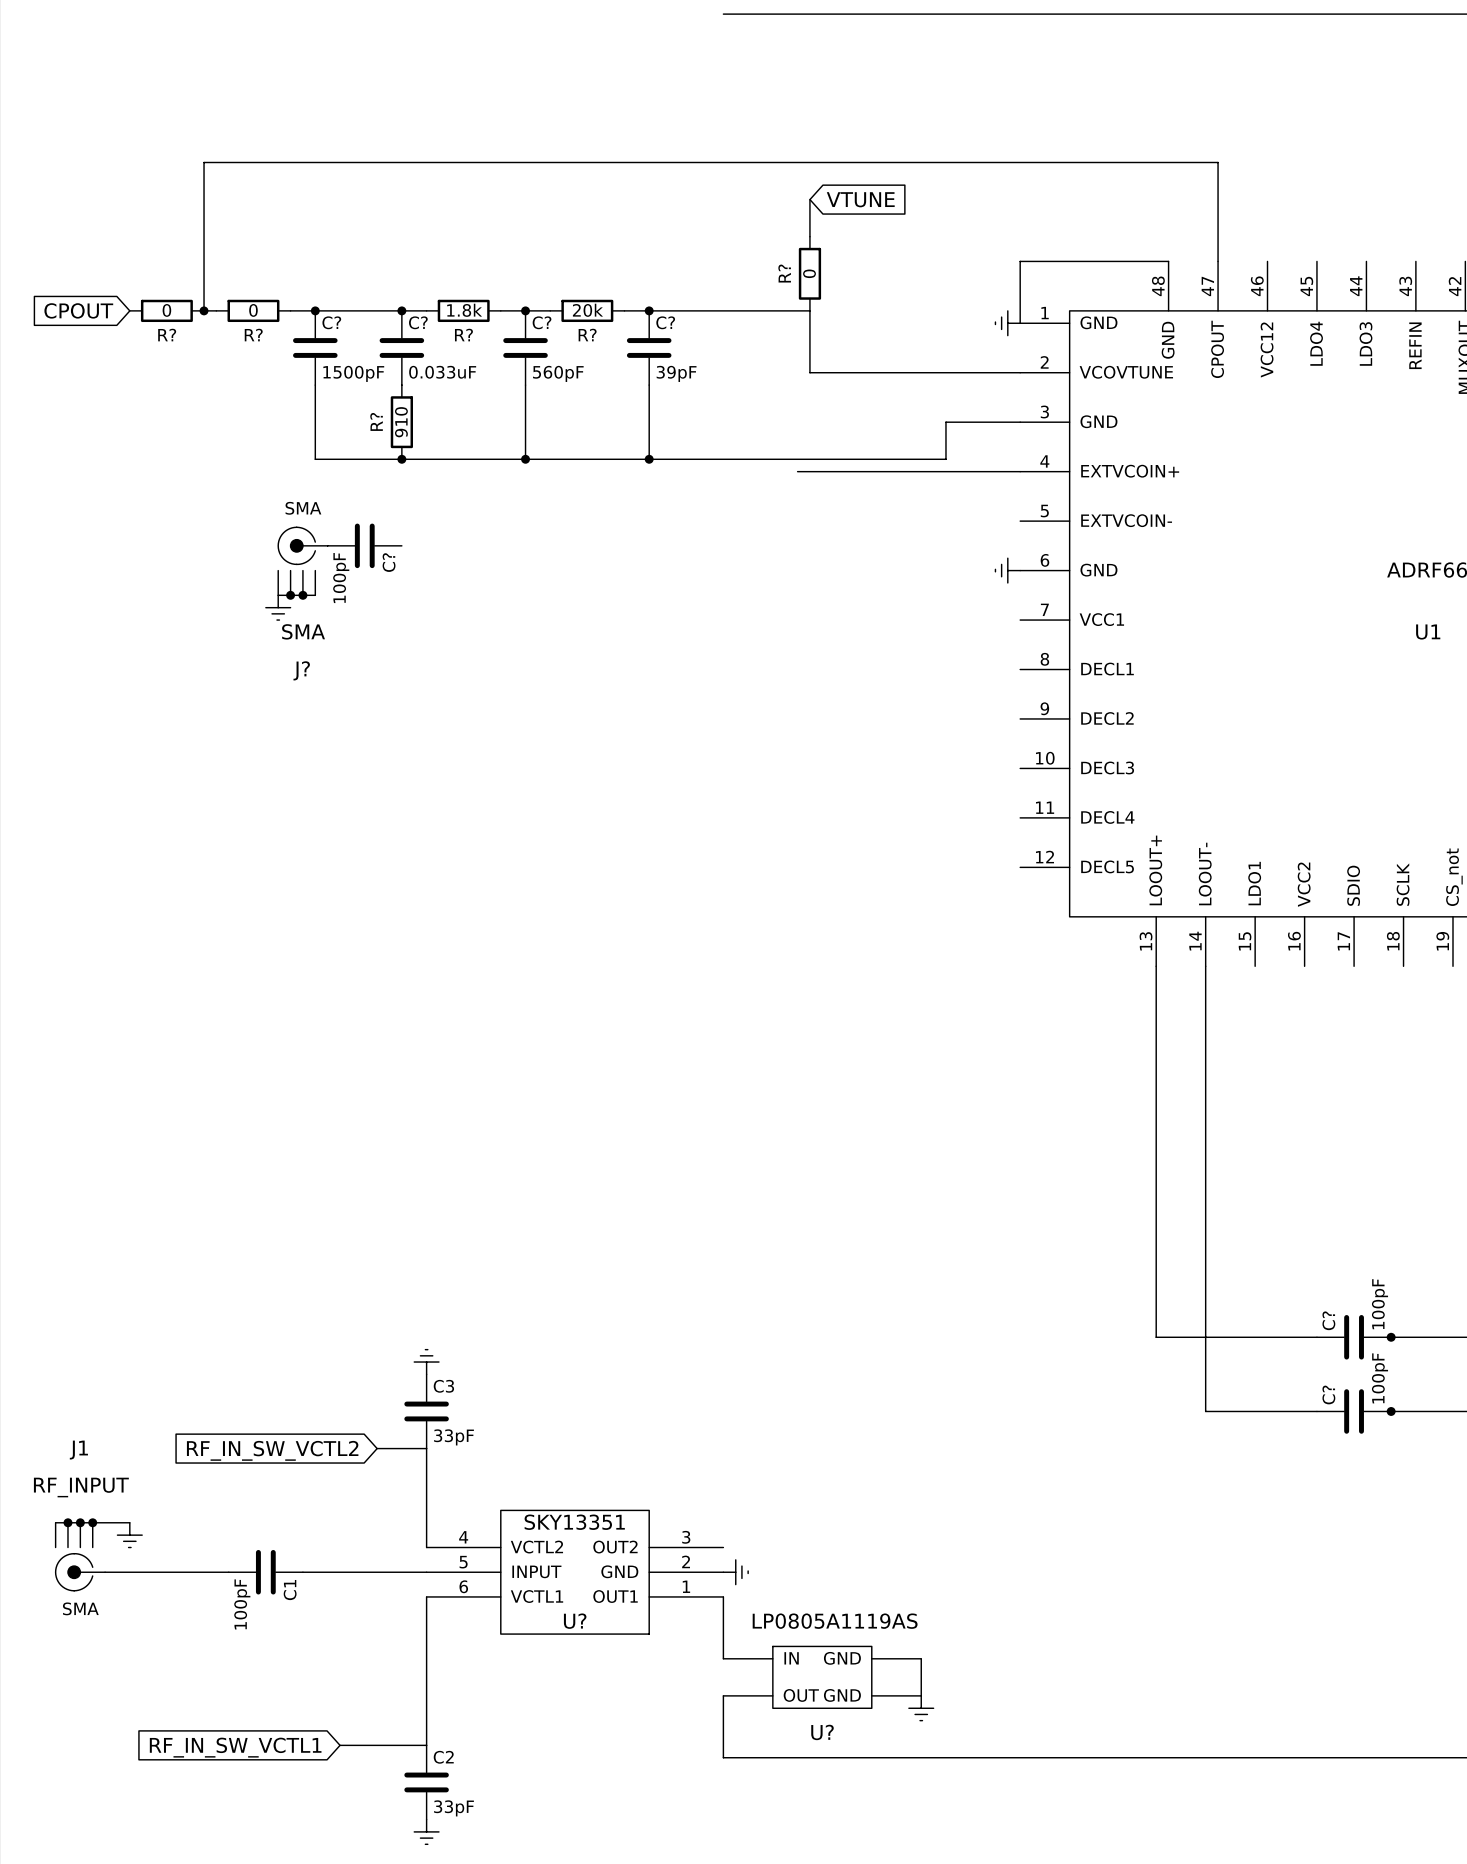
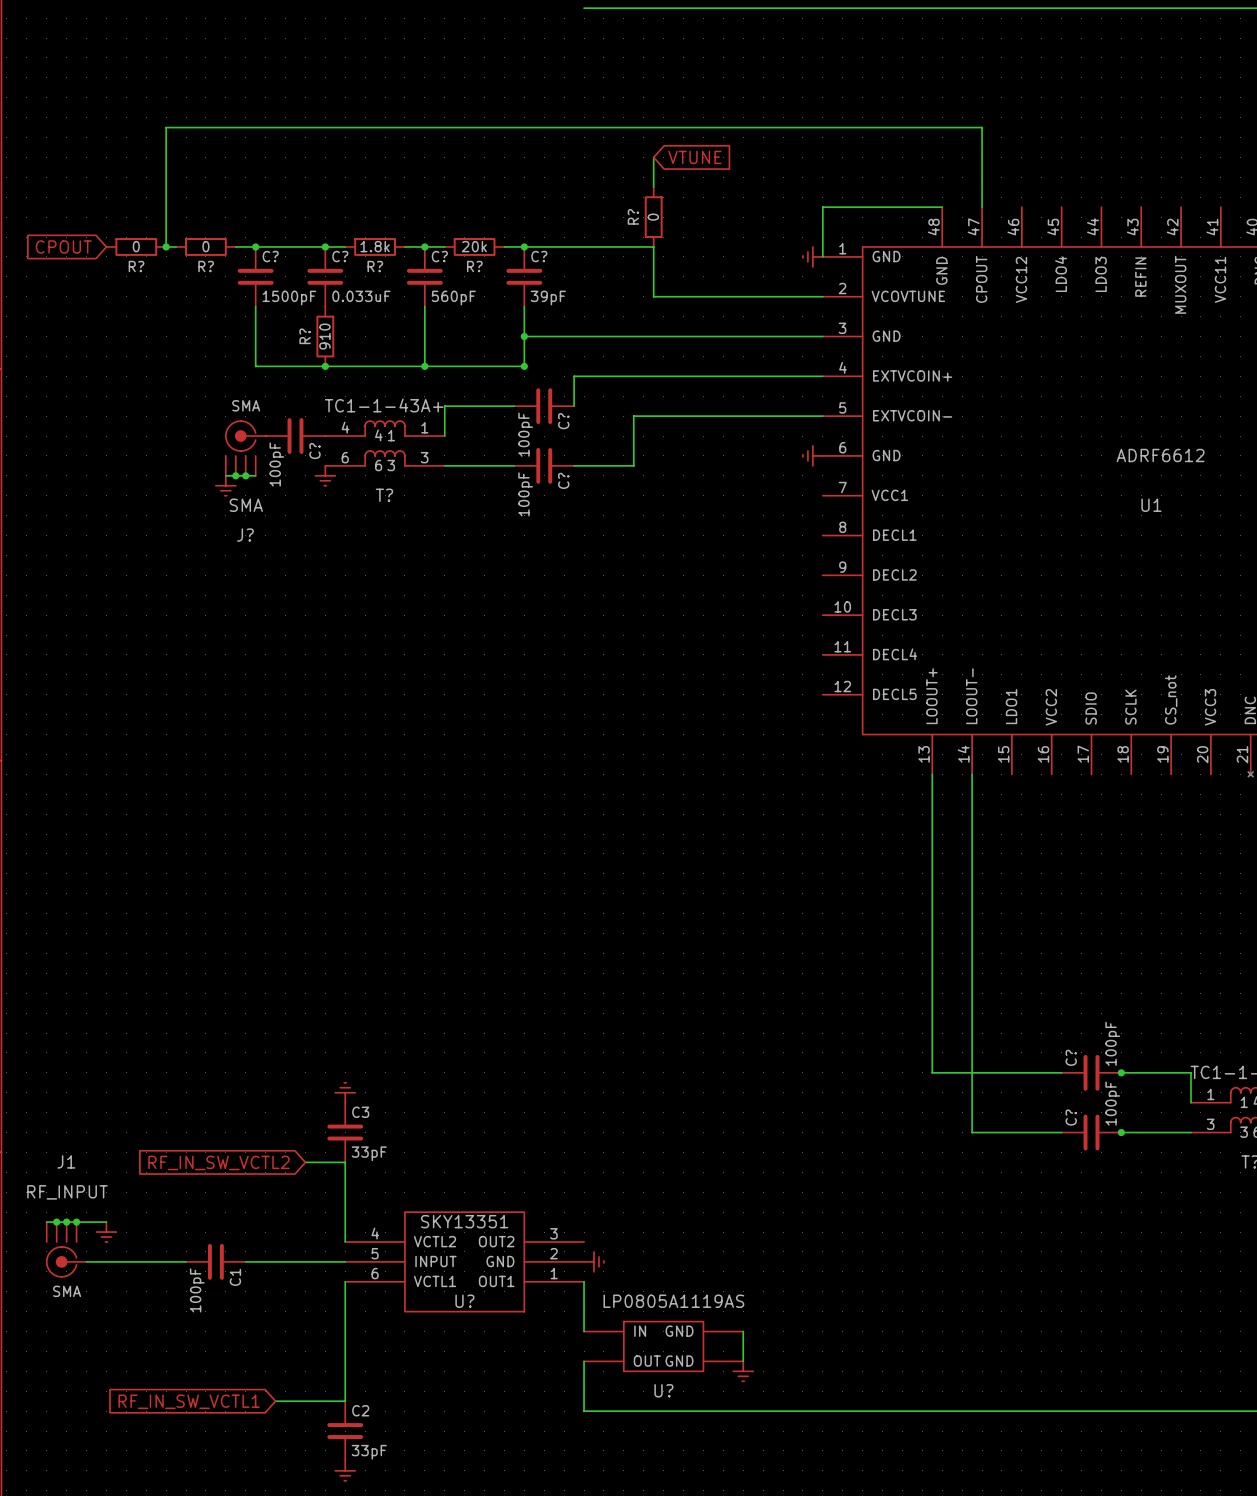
junction: none -> (524, 336)
wire: (945, 422) (945, 459) (649, 459) -> (763, 336) (524, 336)
wire: none -> (643, 376) (574, 376) (574, 406)
wire: none -> (514, 406) (444, 406) (444, 436)
C?: none -> 100pF (544, 406)
wire: none -> (822, 416) (633, 416) (633, 465) (574, 465)
T?: none -> TC1-1-43A+ (385, 443)
wire: none -> (444, 465) (514, 465)
C?: none -> 100pF (544, 465)
power symbol: none -> (325, 475)

